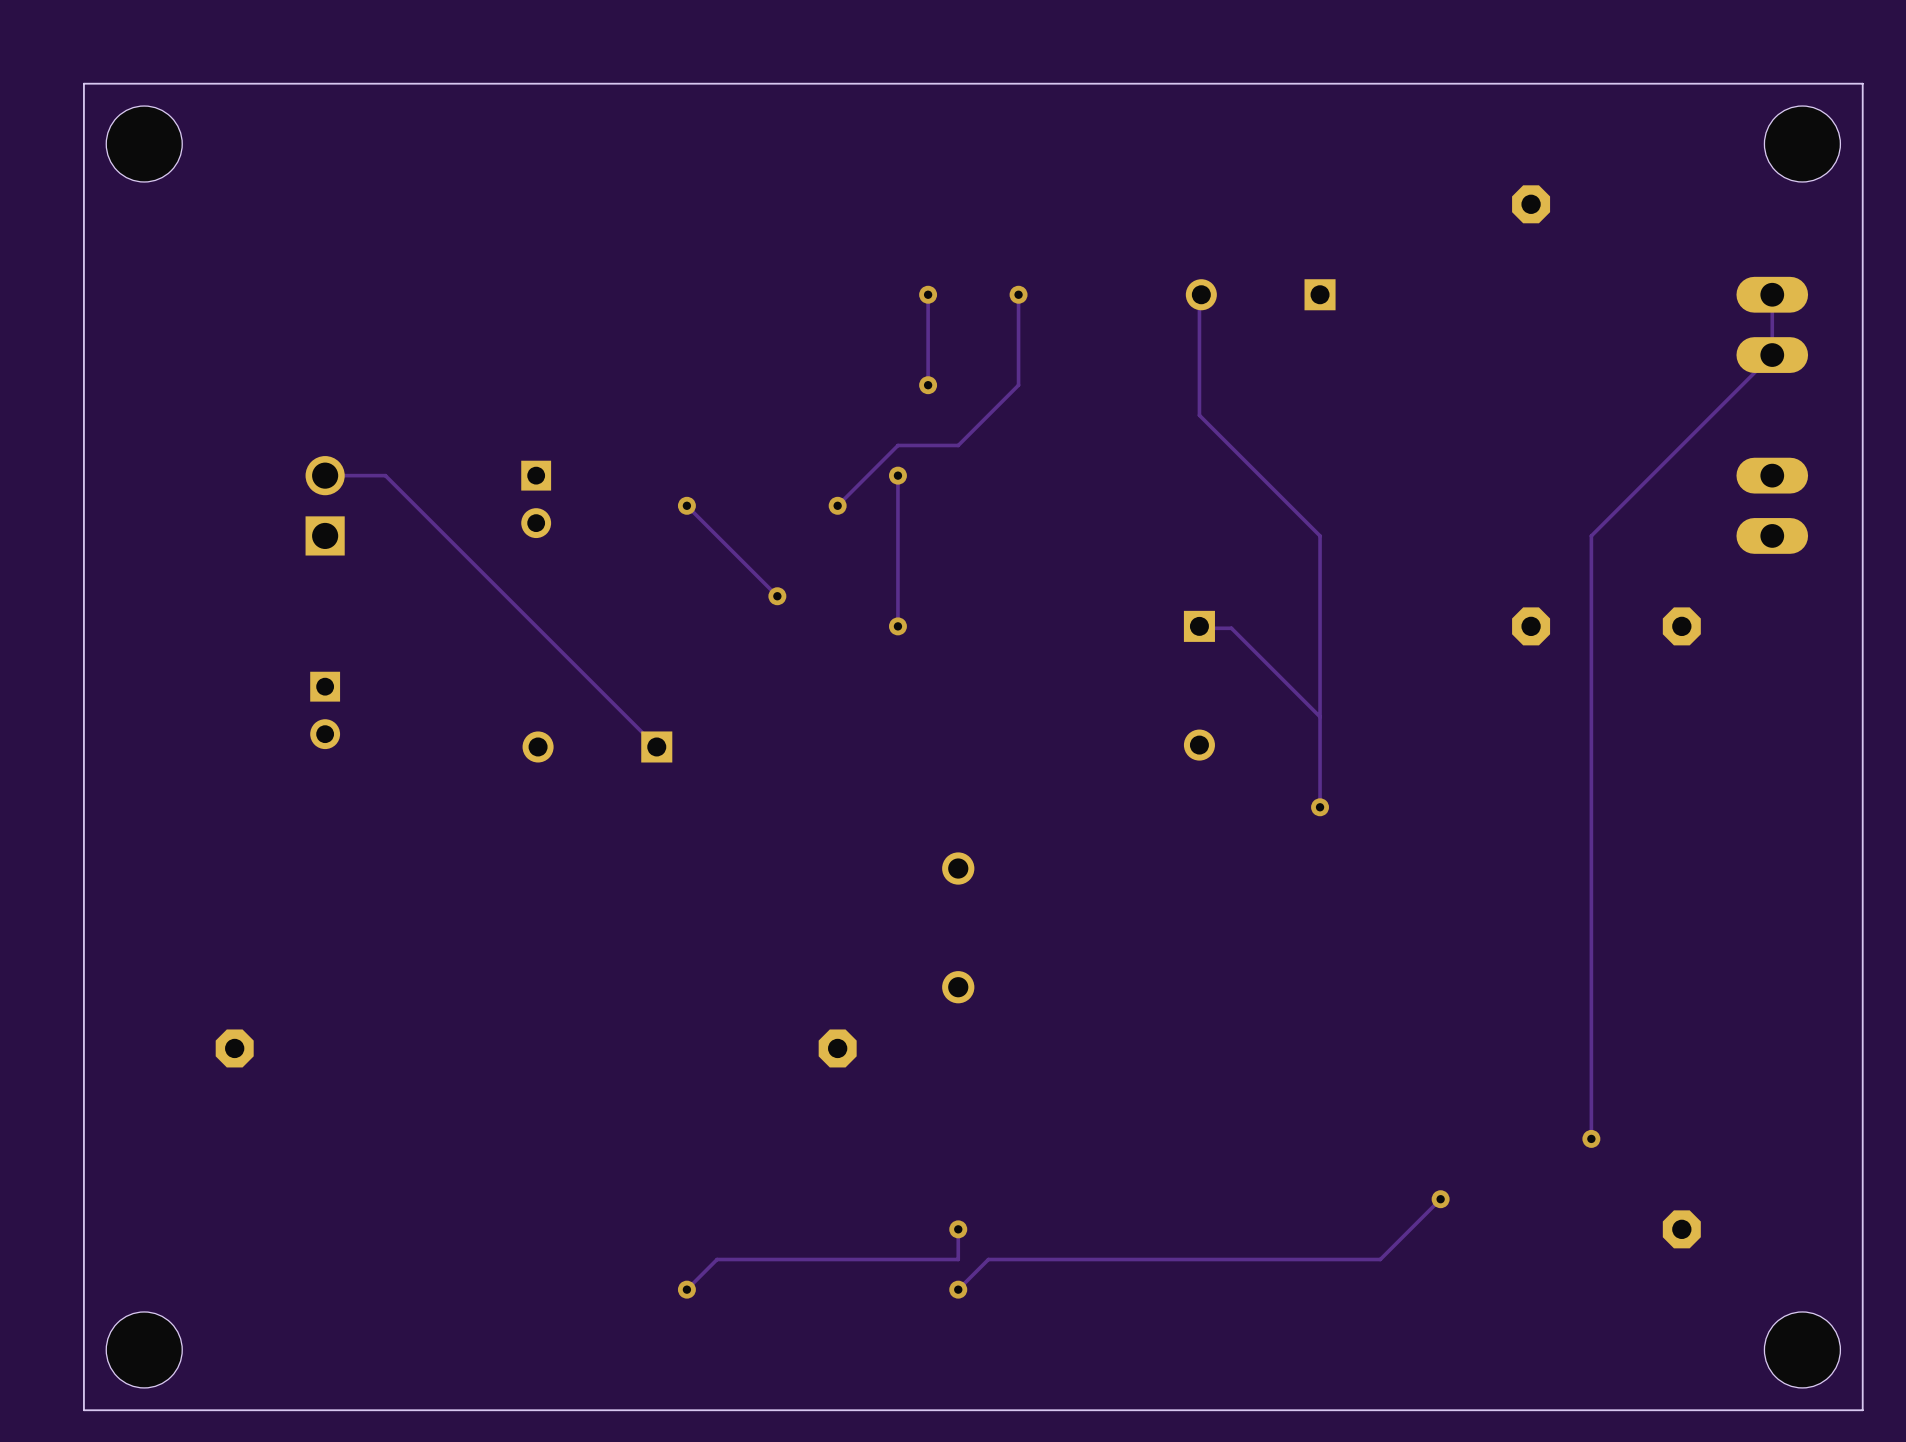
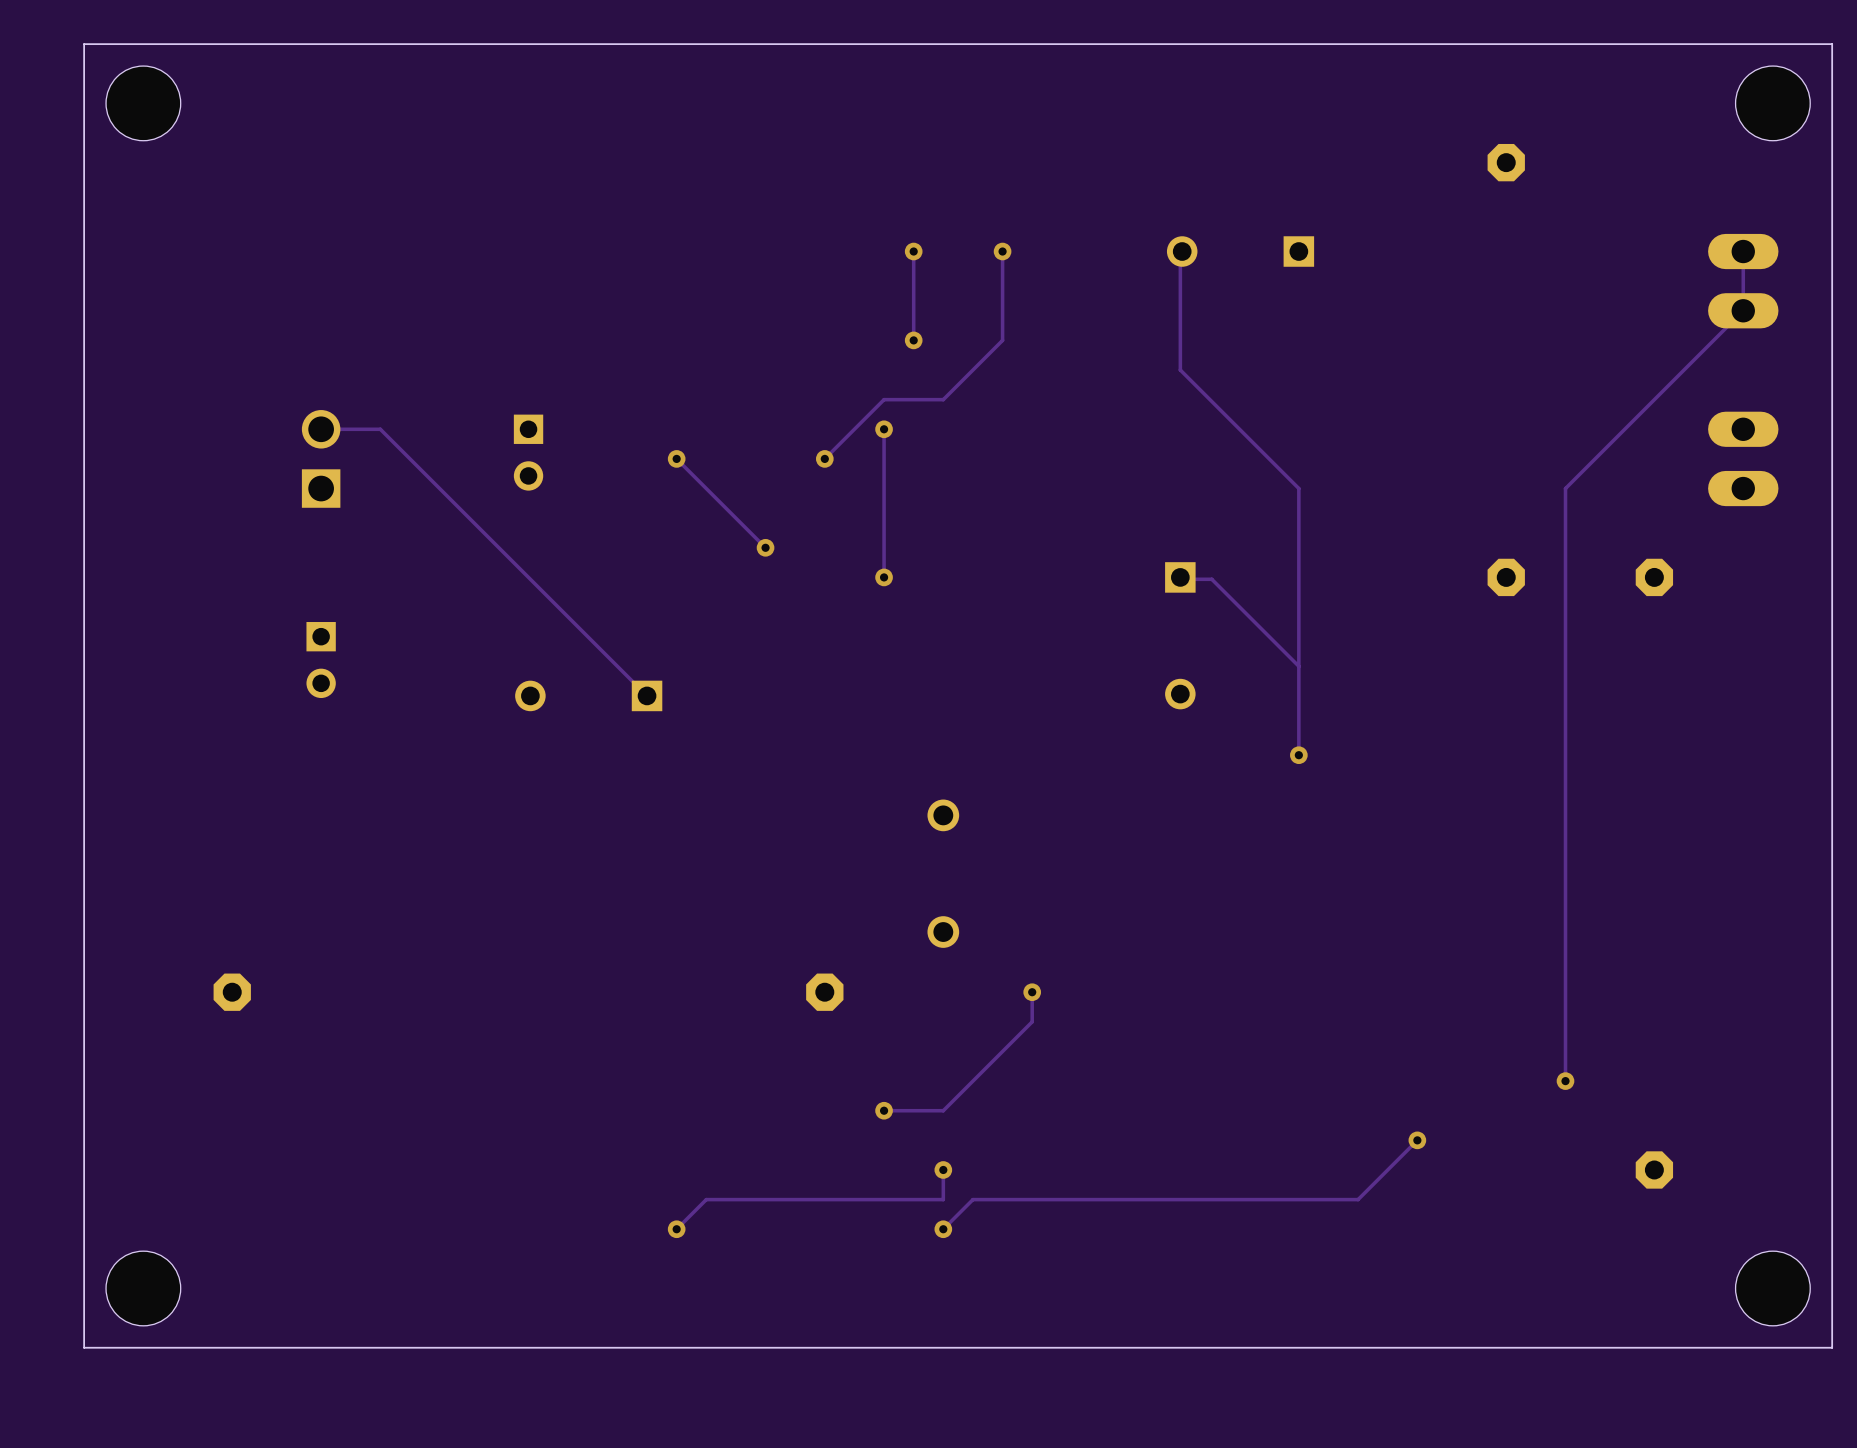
track: none -> (1032, 992) (1032, 1021) (943, 1110) (884, 1110)
via: none -> (1032, 992)
via: none -> (884, 1110)

